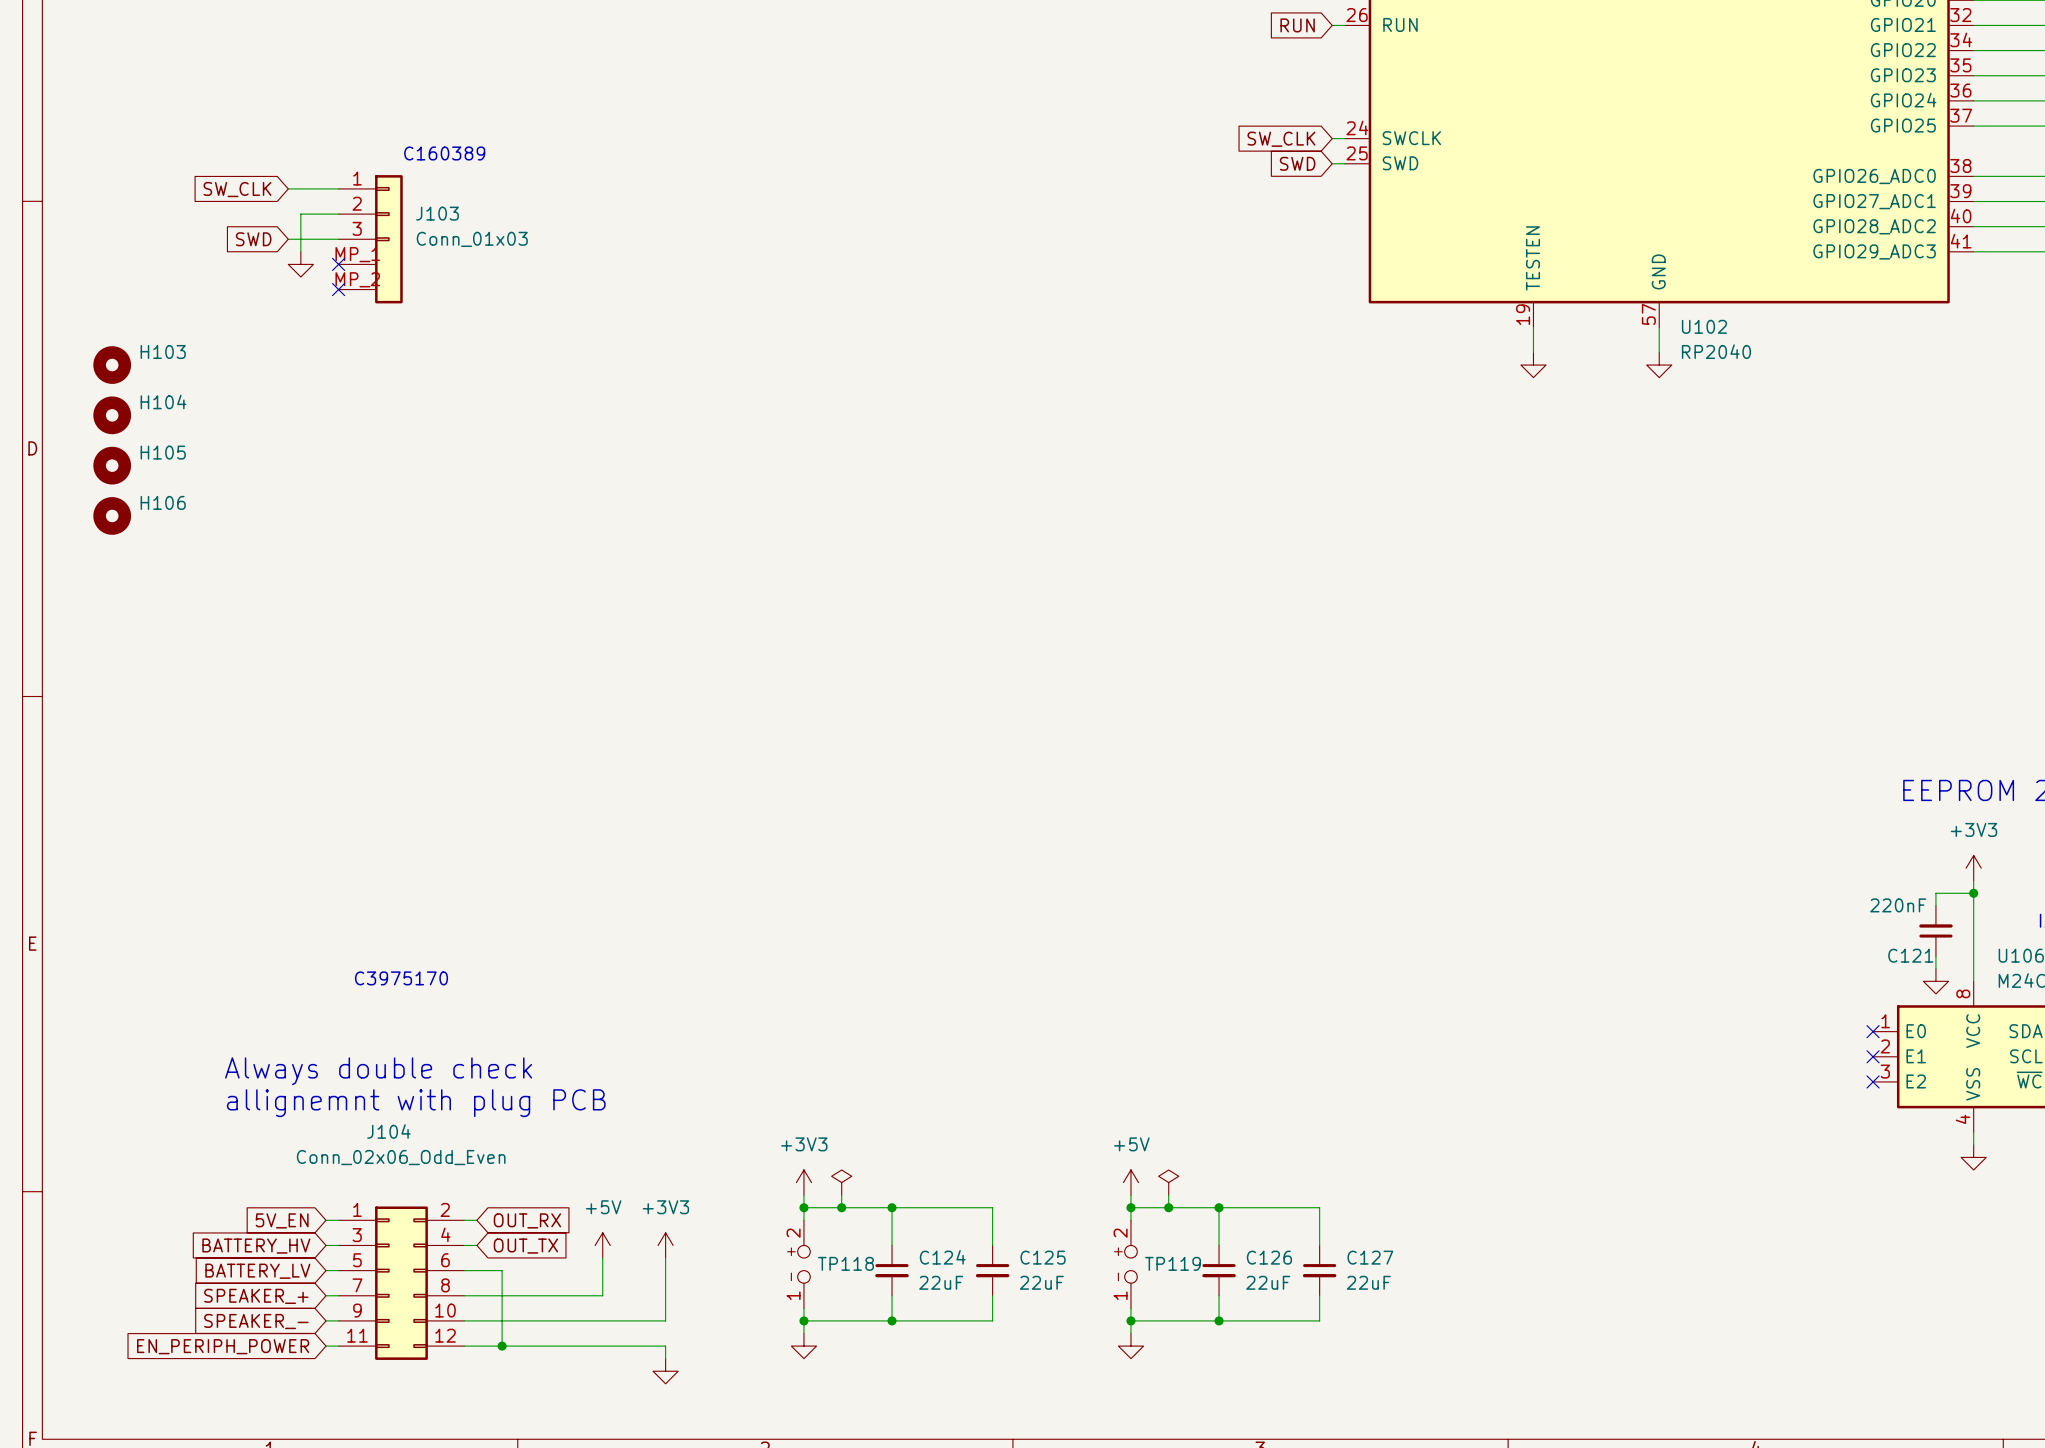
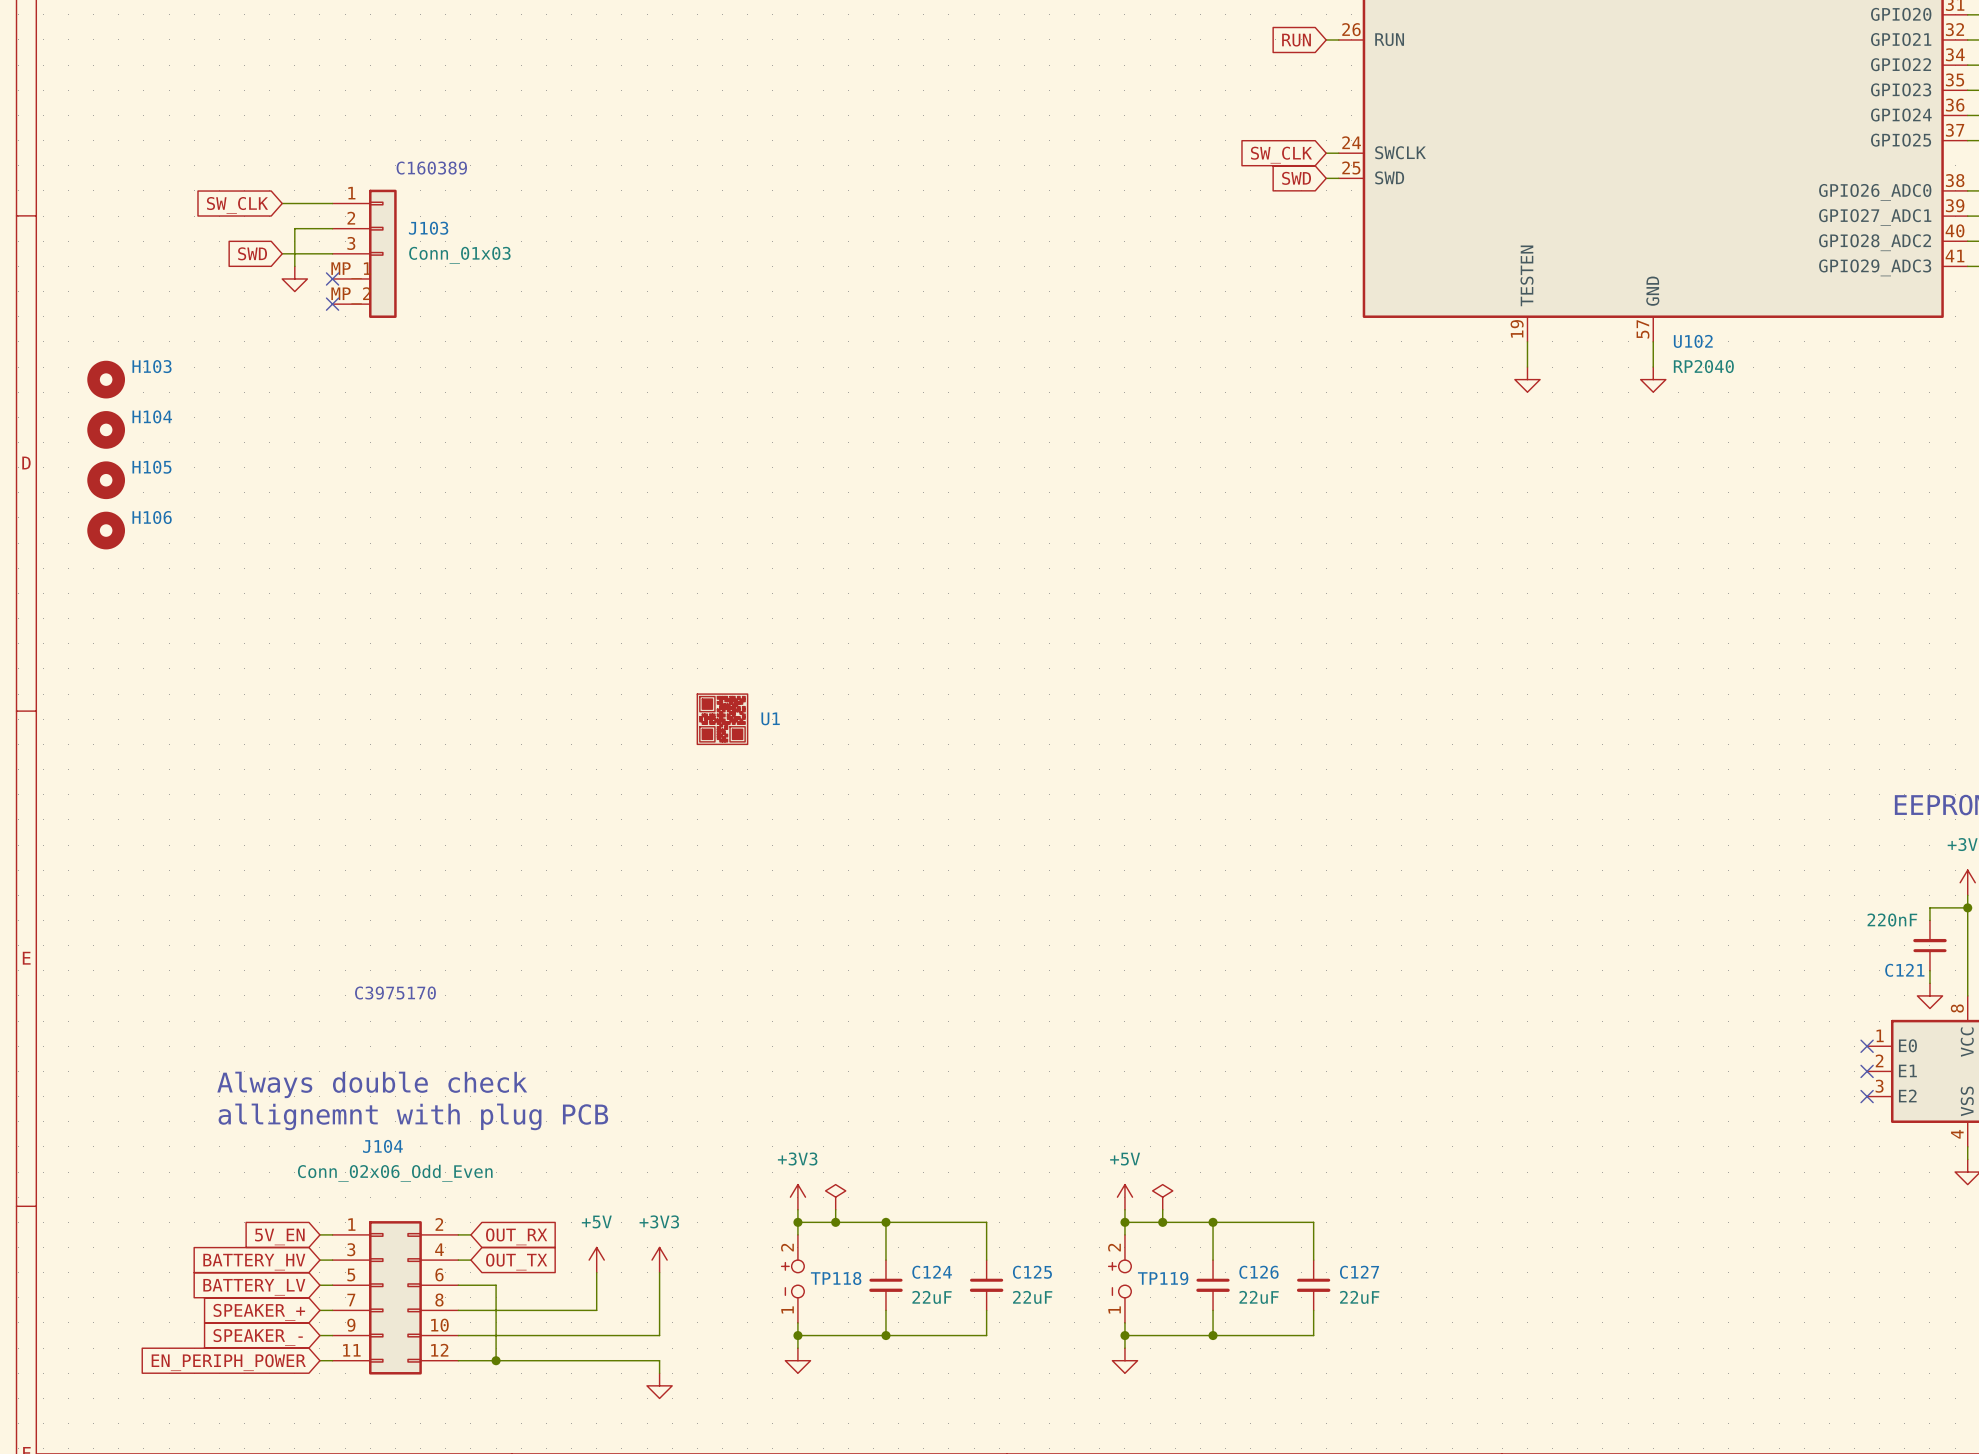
U1: none -> (722, 719)

